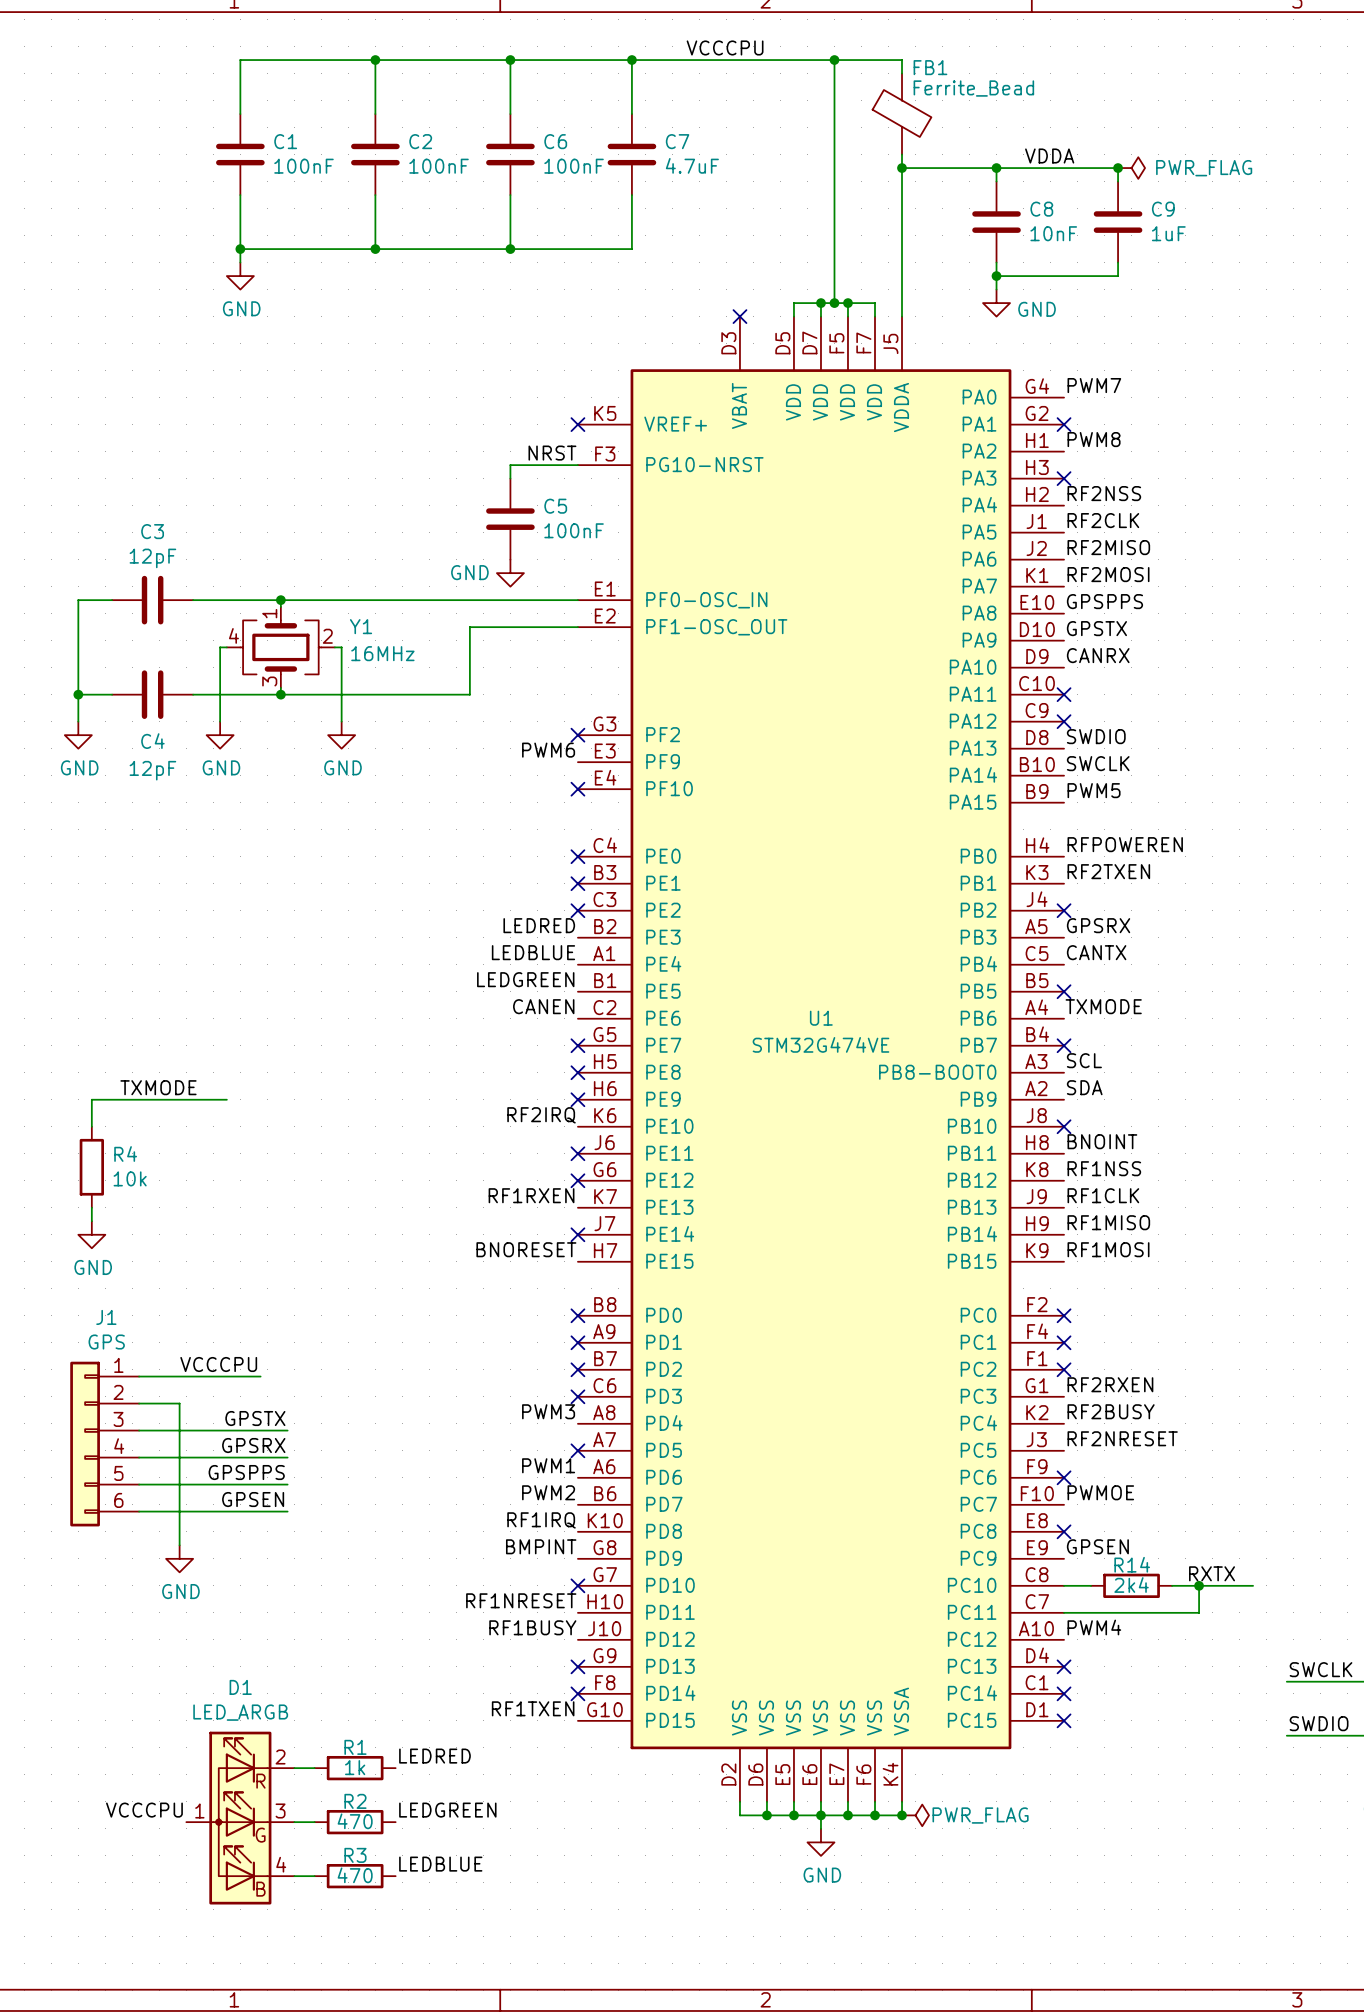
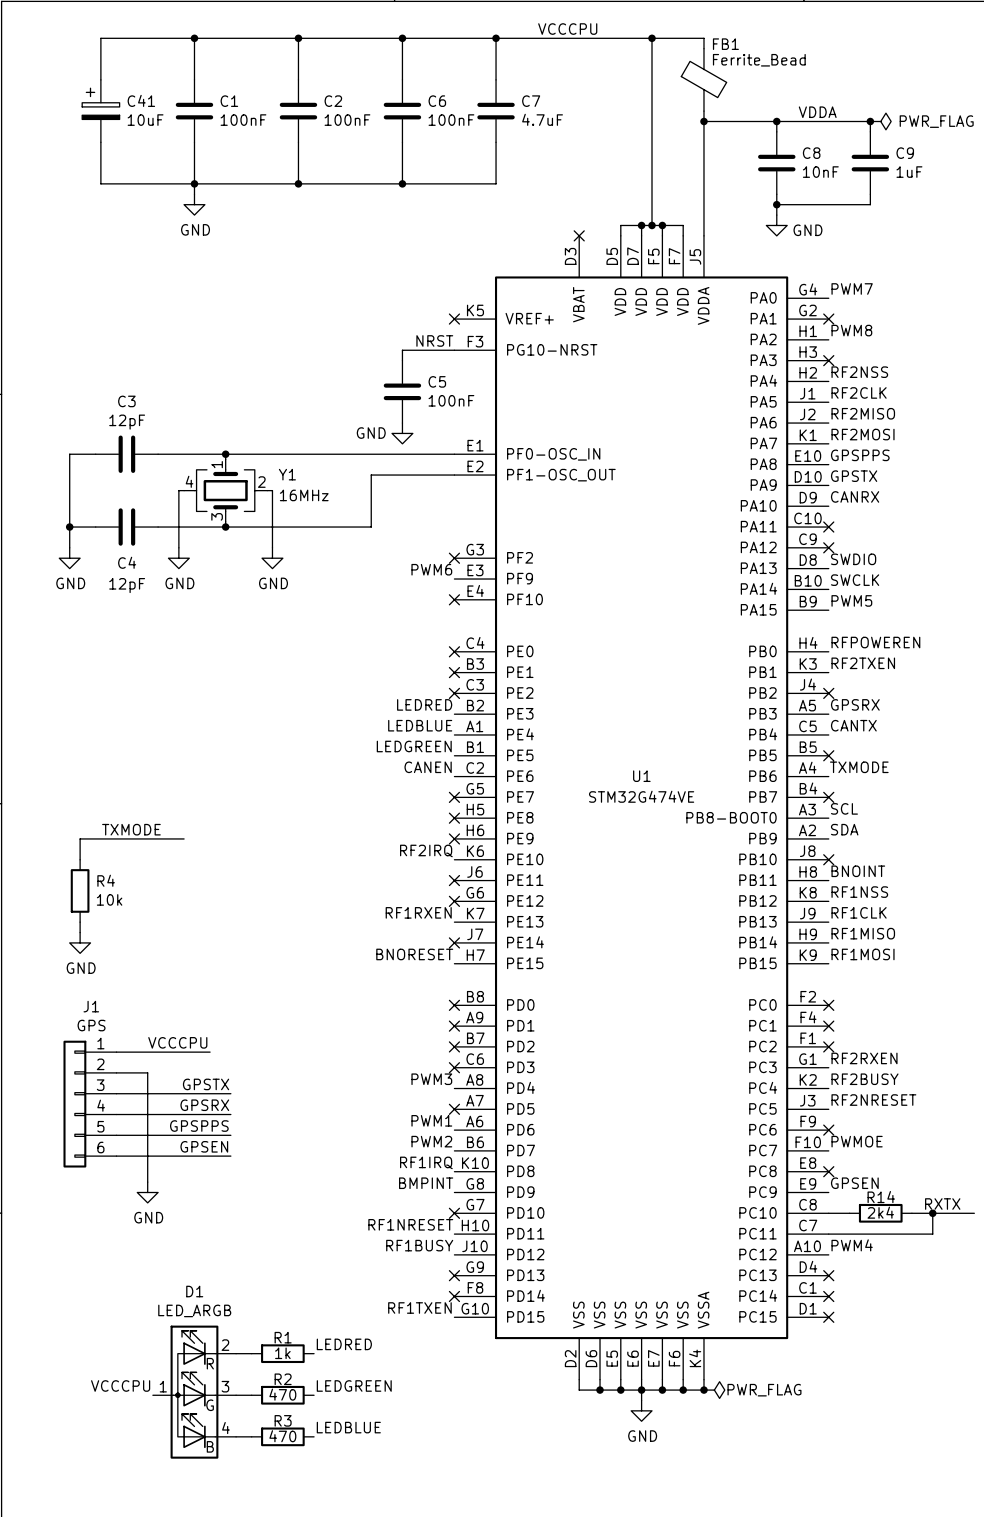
wire: none -> (194, 38) (100, 38) (100, 79)
junction: none -> (194, 38)
C41: none -> 10uF (100, 111)
wire: none -> (100, 142) (100, 183) (194, 183)

